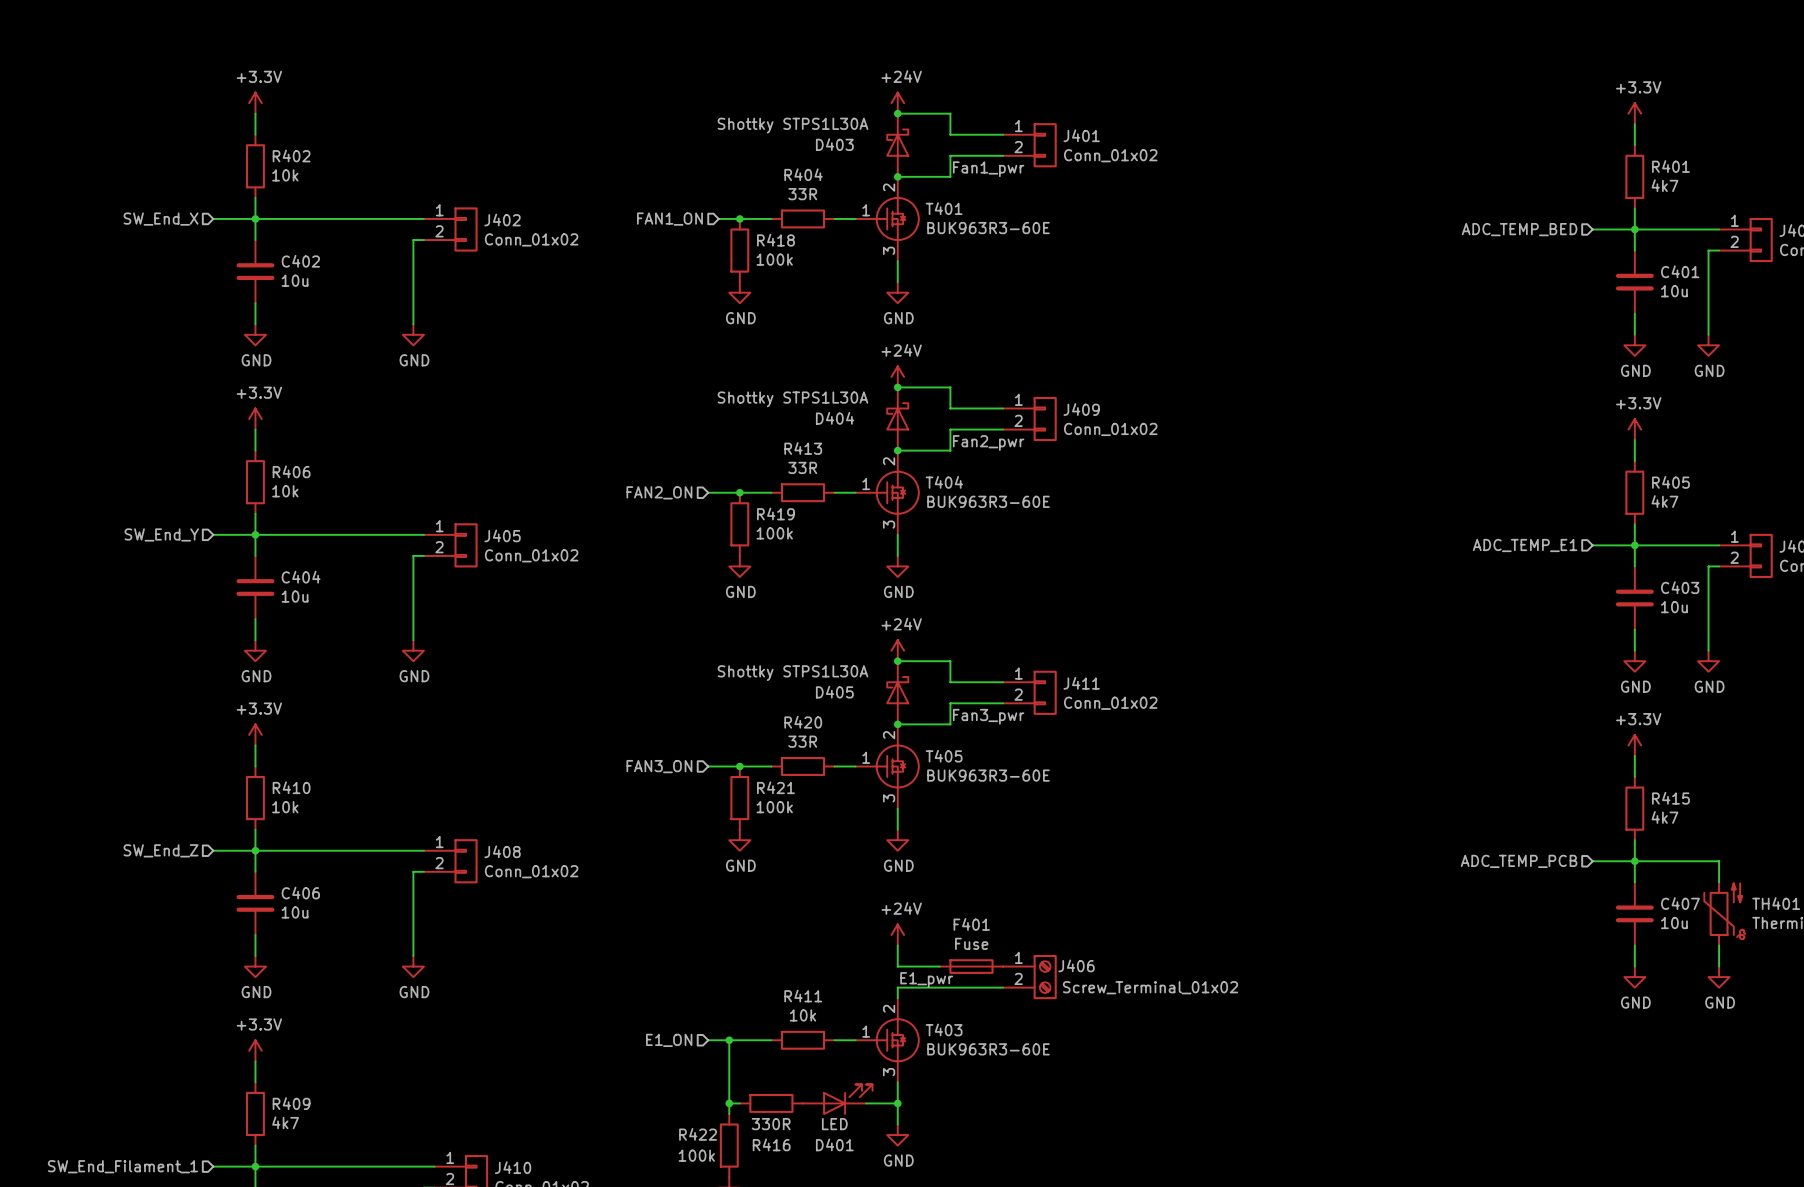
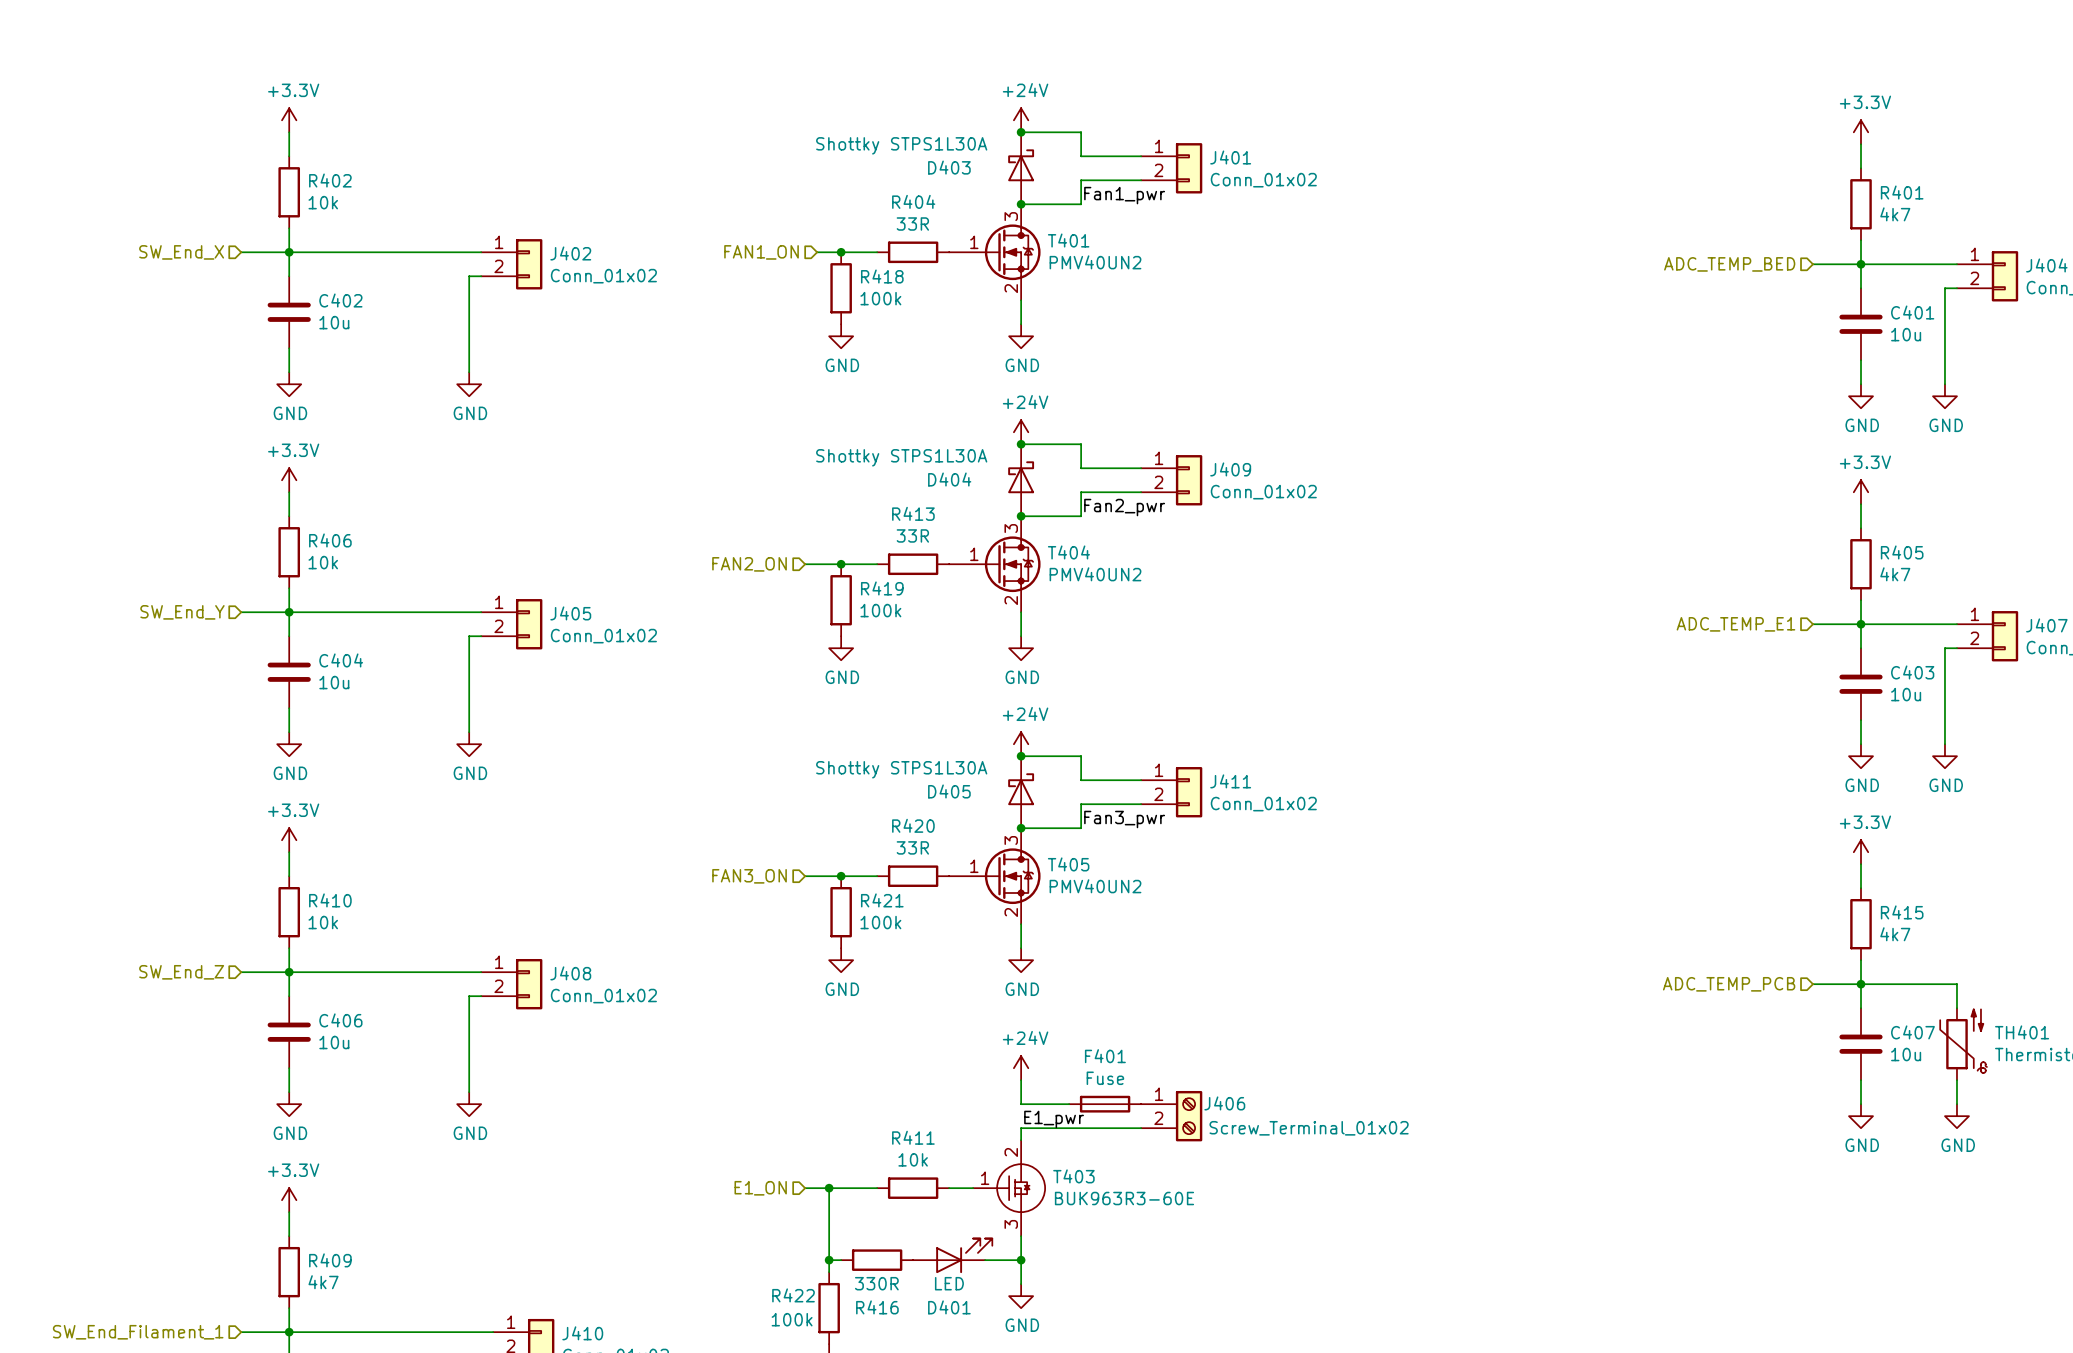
T401 symbol: [855, 176, 919, 262] -> [949, 204, 1041, 301]
T401 value: BUK963R3-60E (988, 228) -> PMV40UN2 (1095, 262)
T404 symbol: [855, 450, 919, 535] -> [949, 516, 1041, 613]
T404 value: BUK963R3-60E (988, 501) -> PMV40UN2 (1095, 574)
T405 symbol: [855, 724, 919, 809] -> [949, 828, 1041, 925]
T405 value: BUK963R3-60E (988, 775) -> PMV40UN2 (1095, 886)

